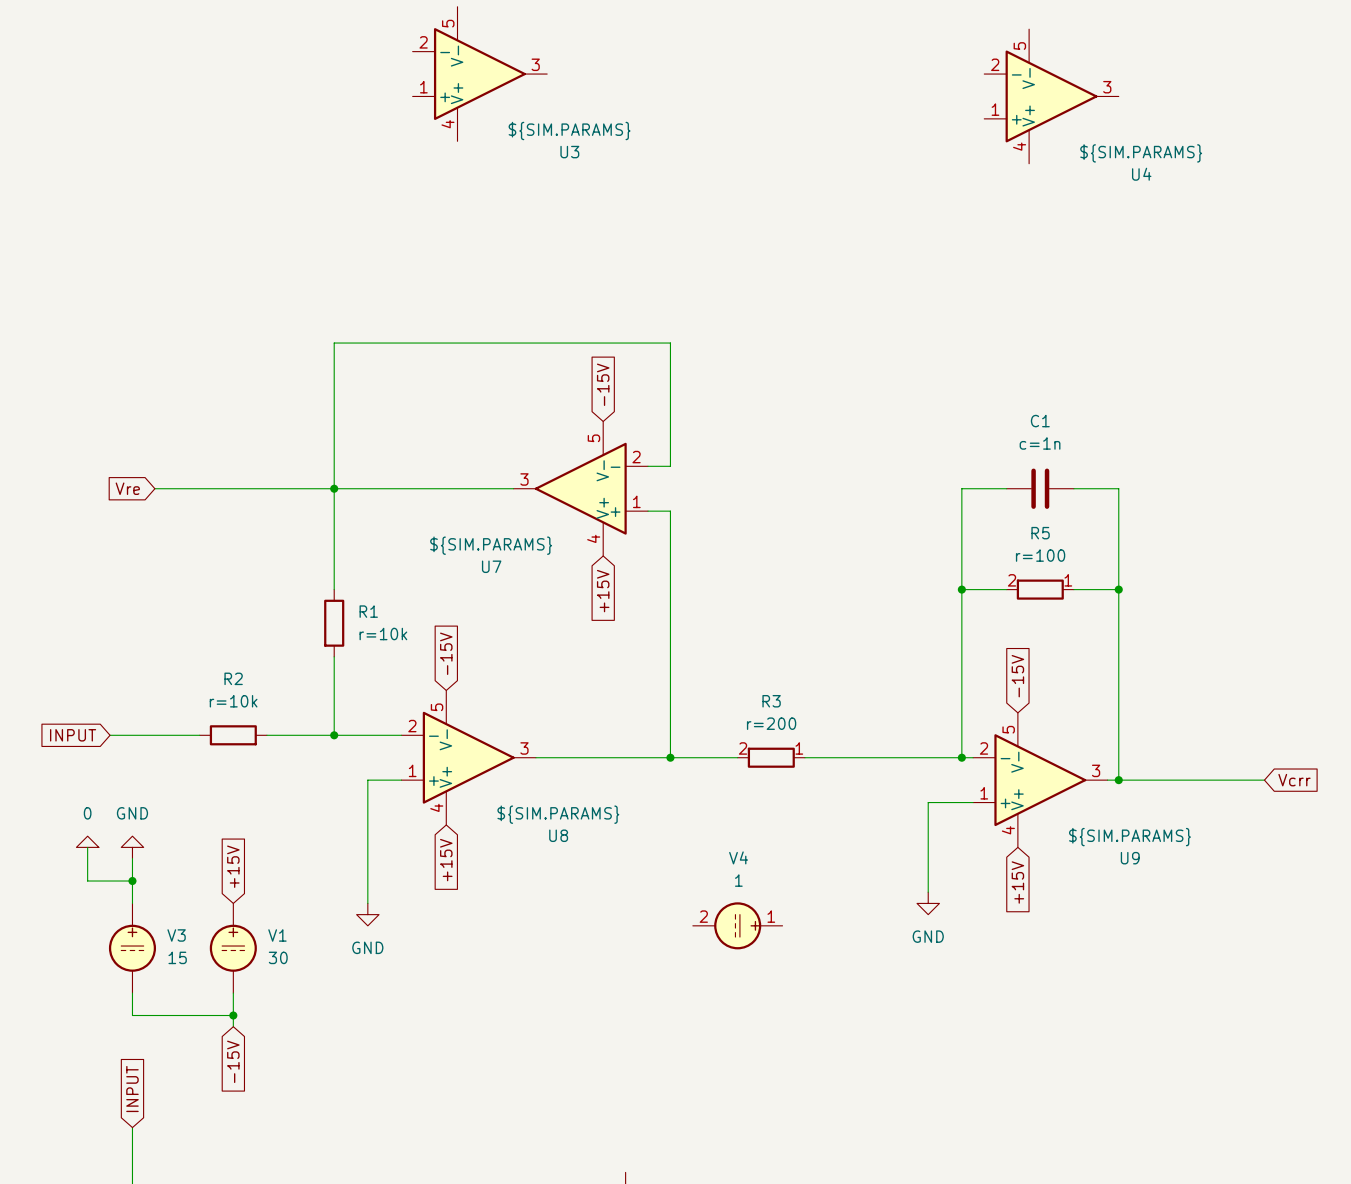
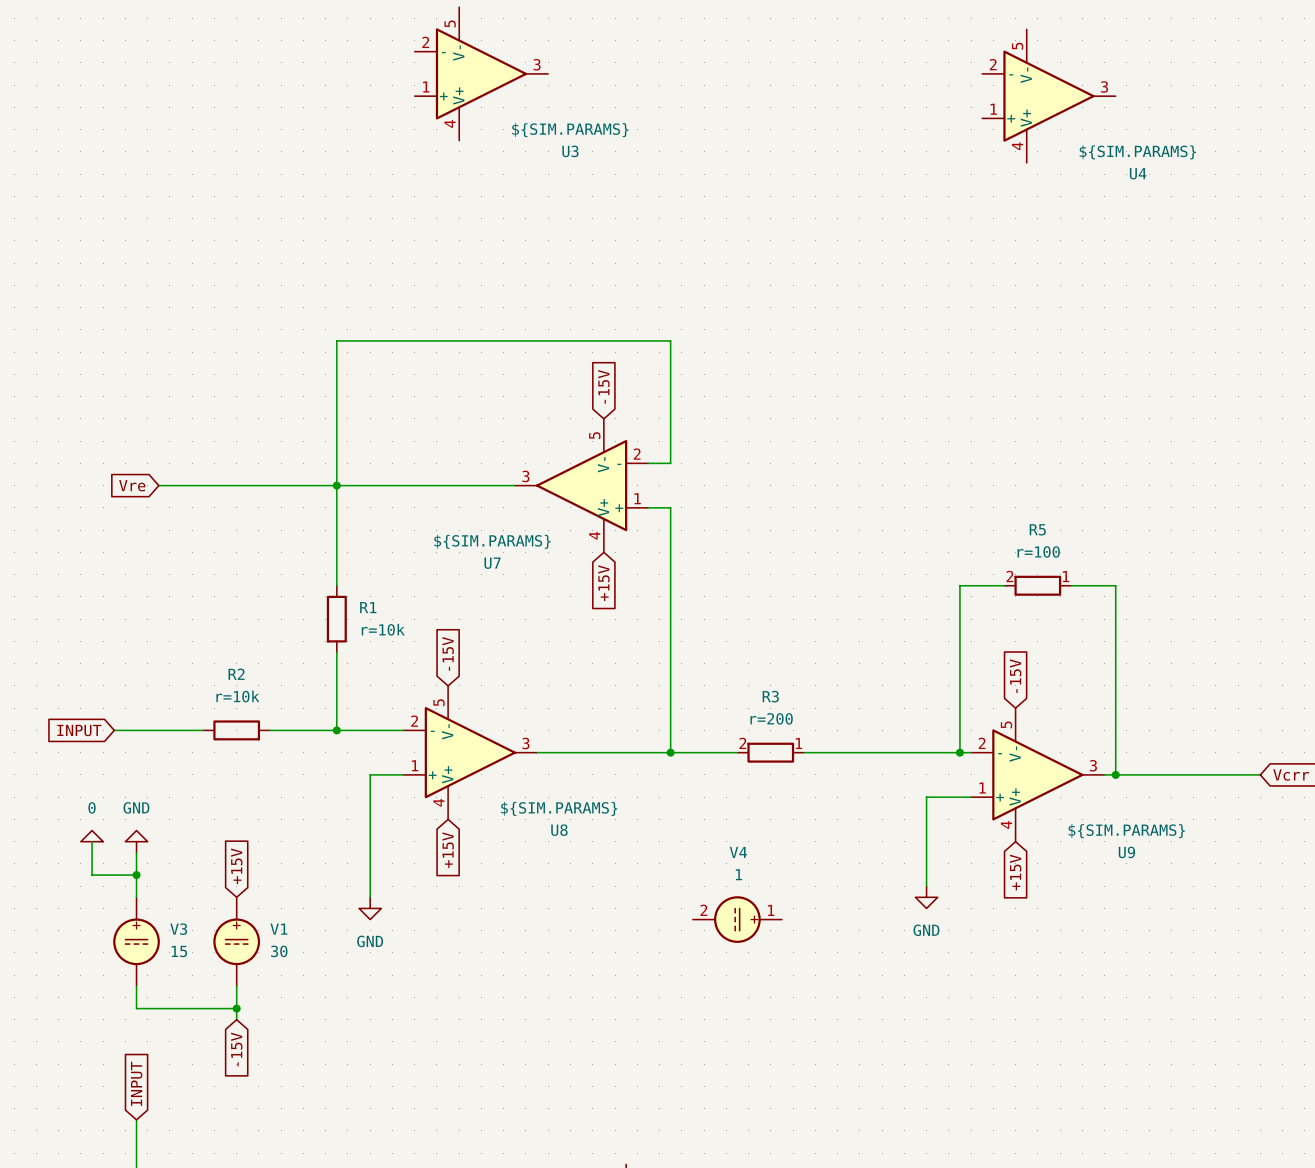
wire: (1006, 488) (961, 488) (961, 589) -> none
C1: c=1n (1040, 488) -> none
wire: (1073, 488) (1118, 488) (1118, 589) -> none
junction: (961, 589) -> none
junction: (1118, 589) -> none

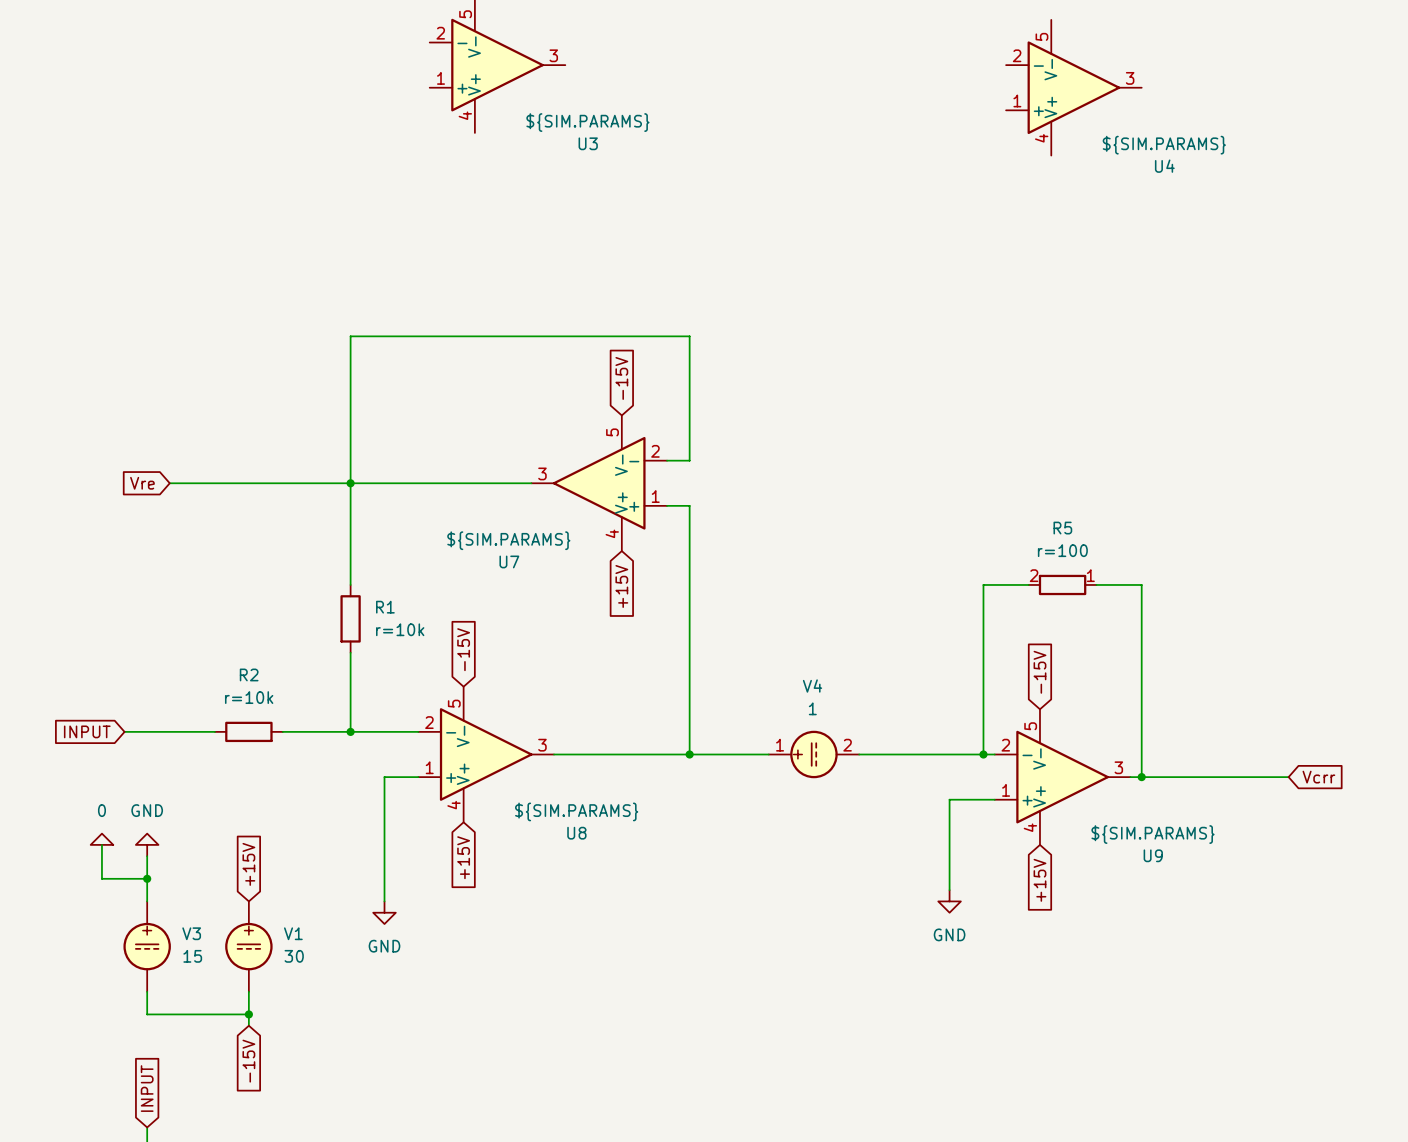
R3: r=200 (770, 752) -> none
V4 rotation: 0° (737, 919) -> 180° (813, 754)
V4 position: (737, 919) -> (813, 754)

